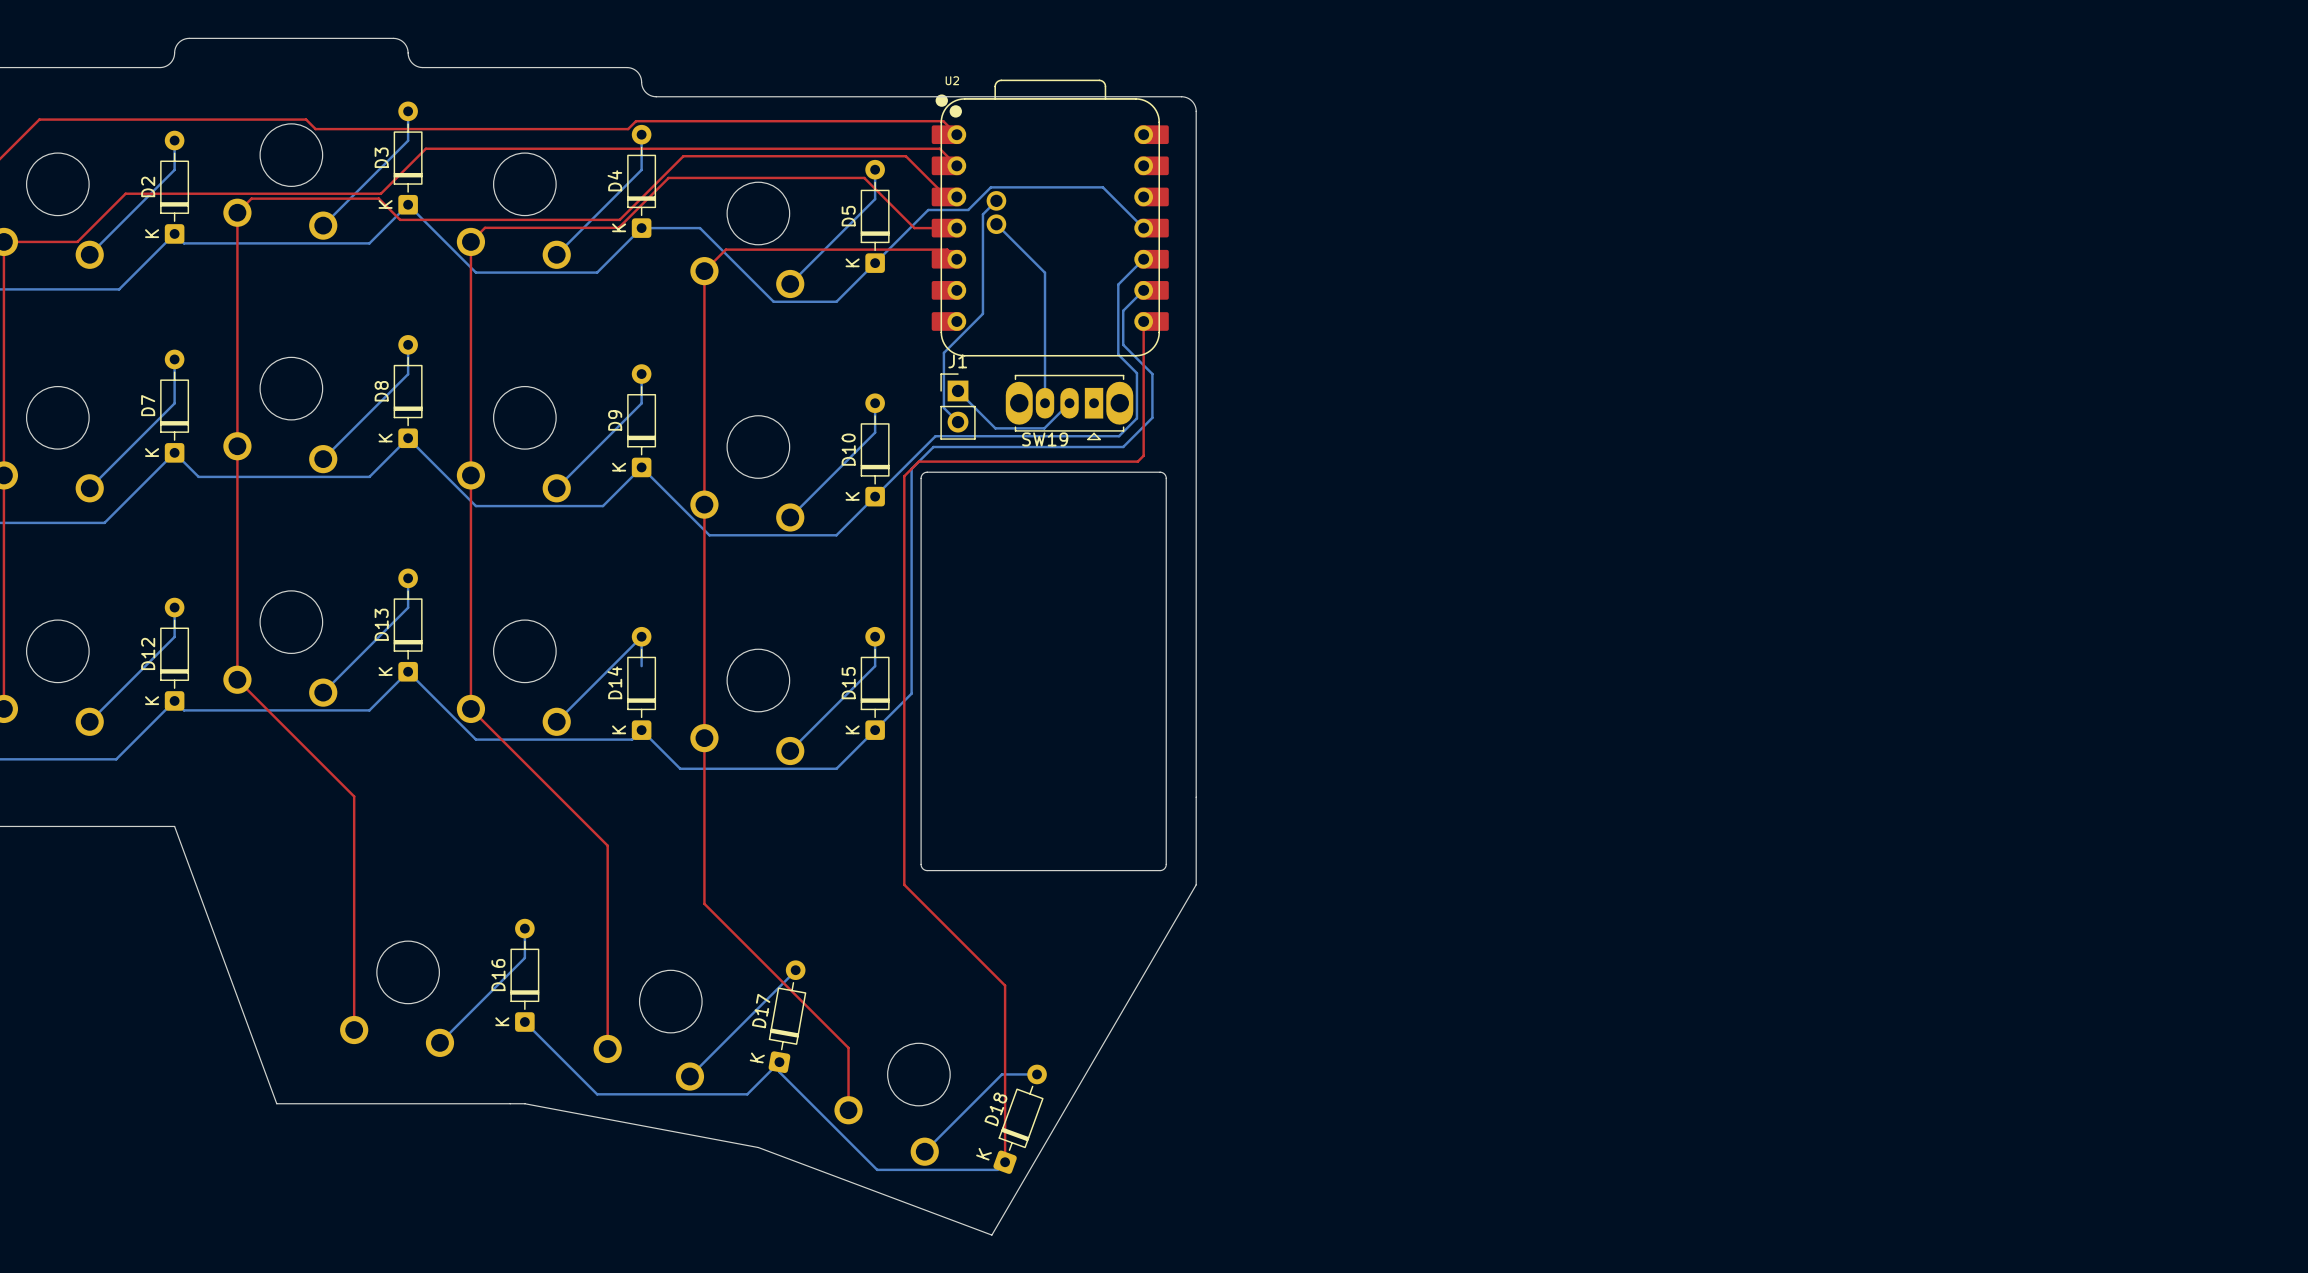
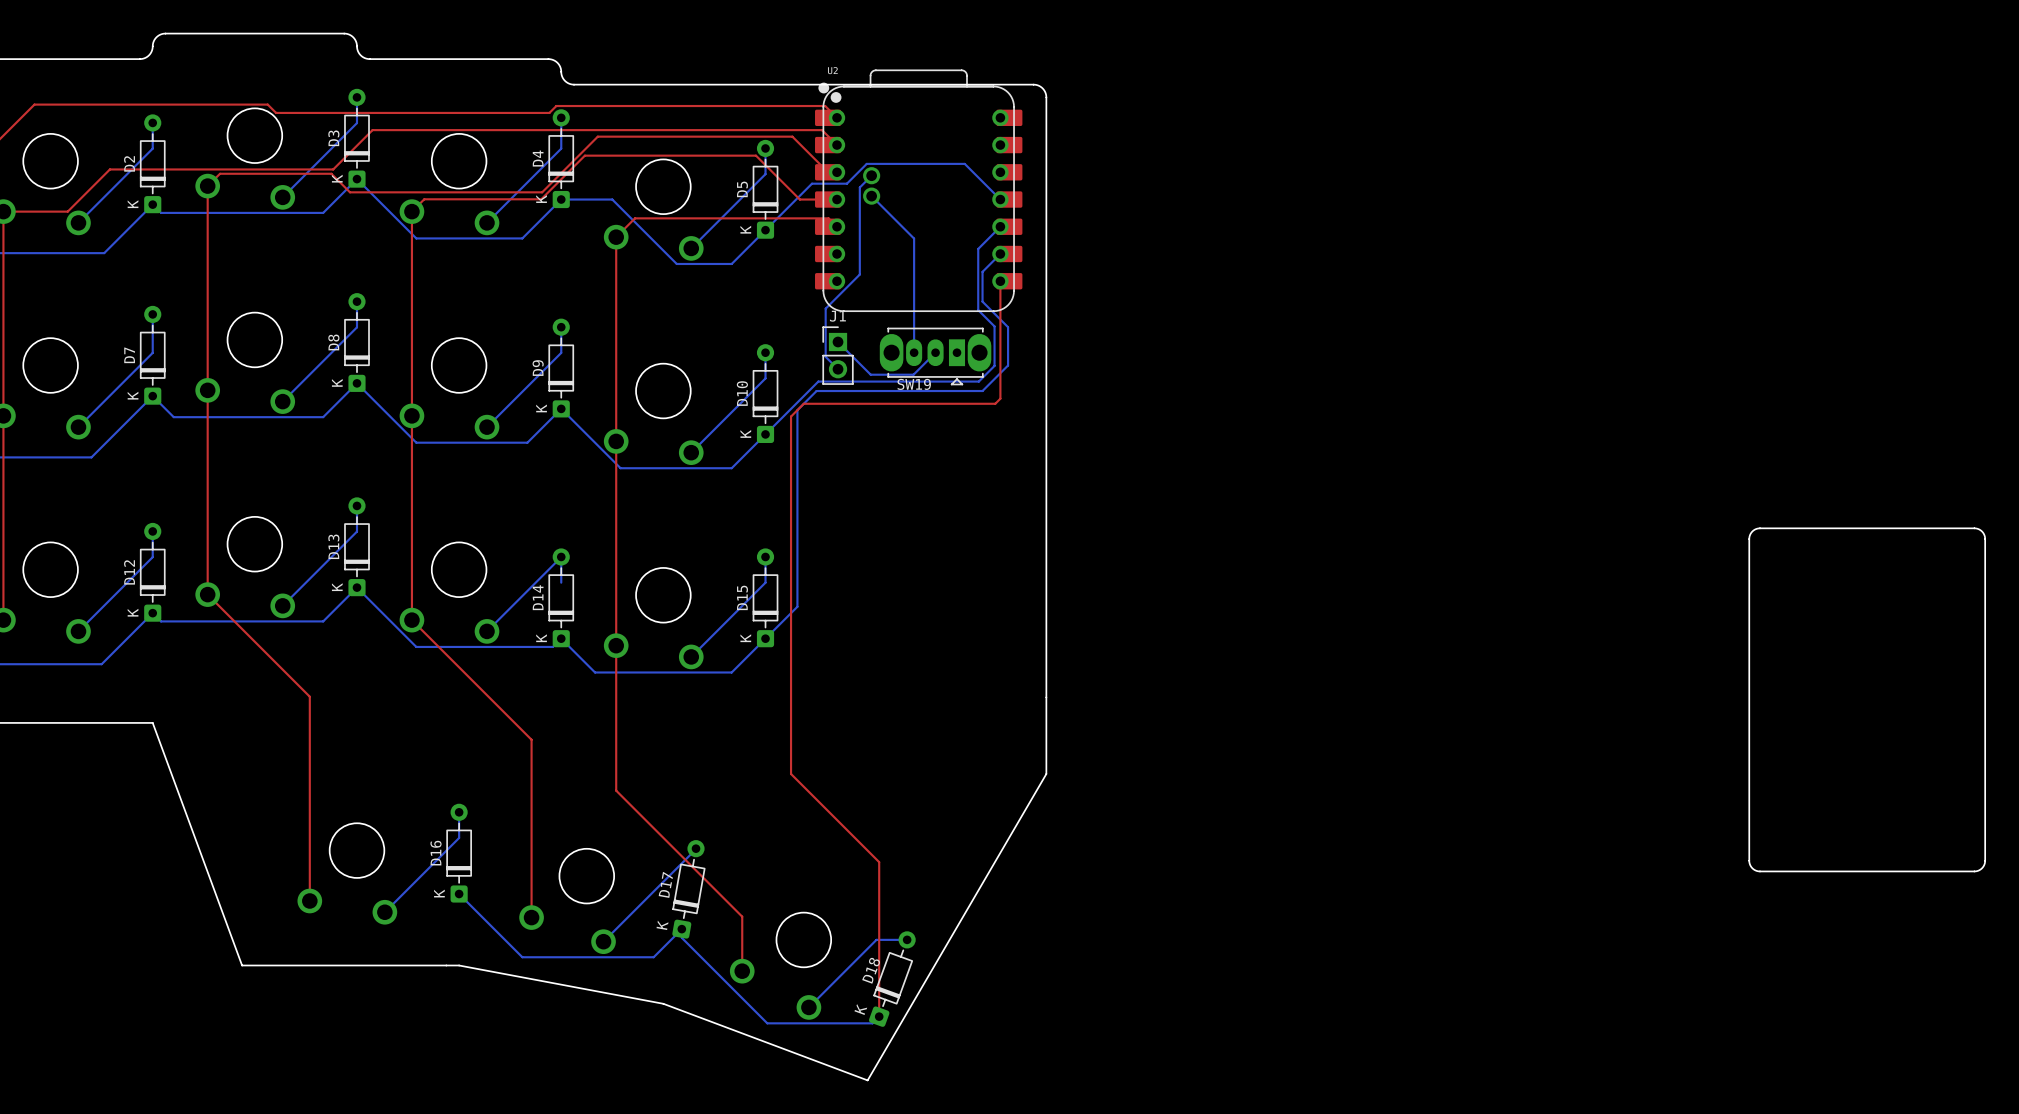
board edge: (927, 472) (1160, 472) (1165, 475) (1166, 864) (1163, 869) (927, 870) (922, 867) (921, 478) (922, 474) (927, 472) -> none
board edge: none -> (1759, 528) (1974, 528) (1983, 533) (1985, 539) (1985, 860) (1980, 869) (1974, 871) (1759, 871) (1750, 866) (1749, 860) (1749, 539) (1752, 531) (1759, 528)

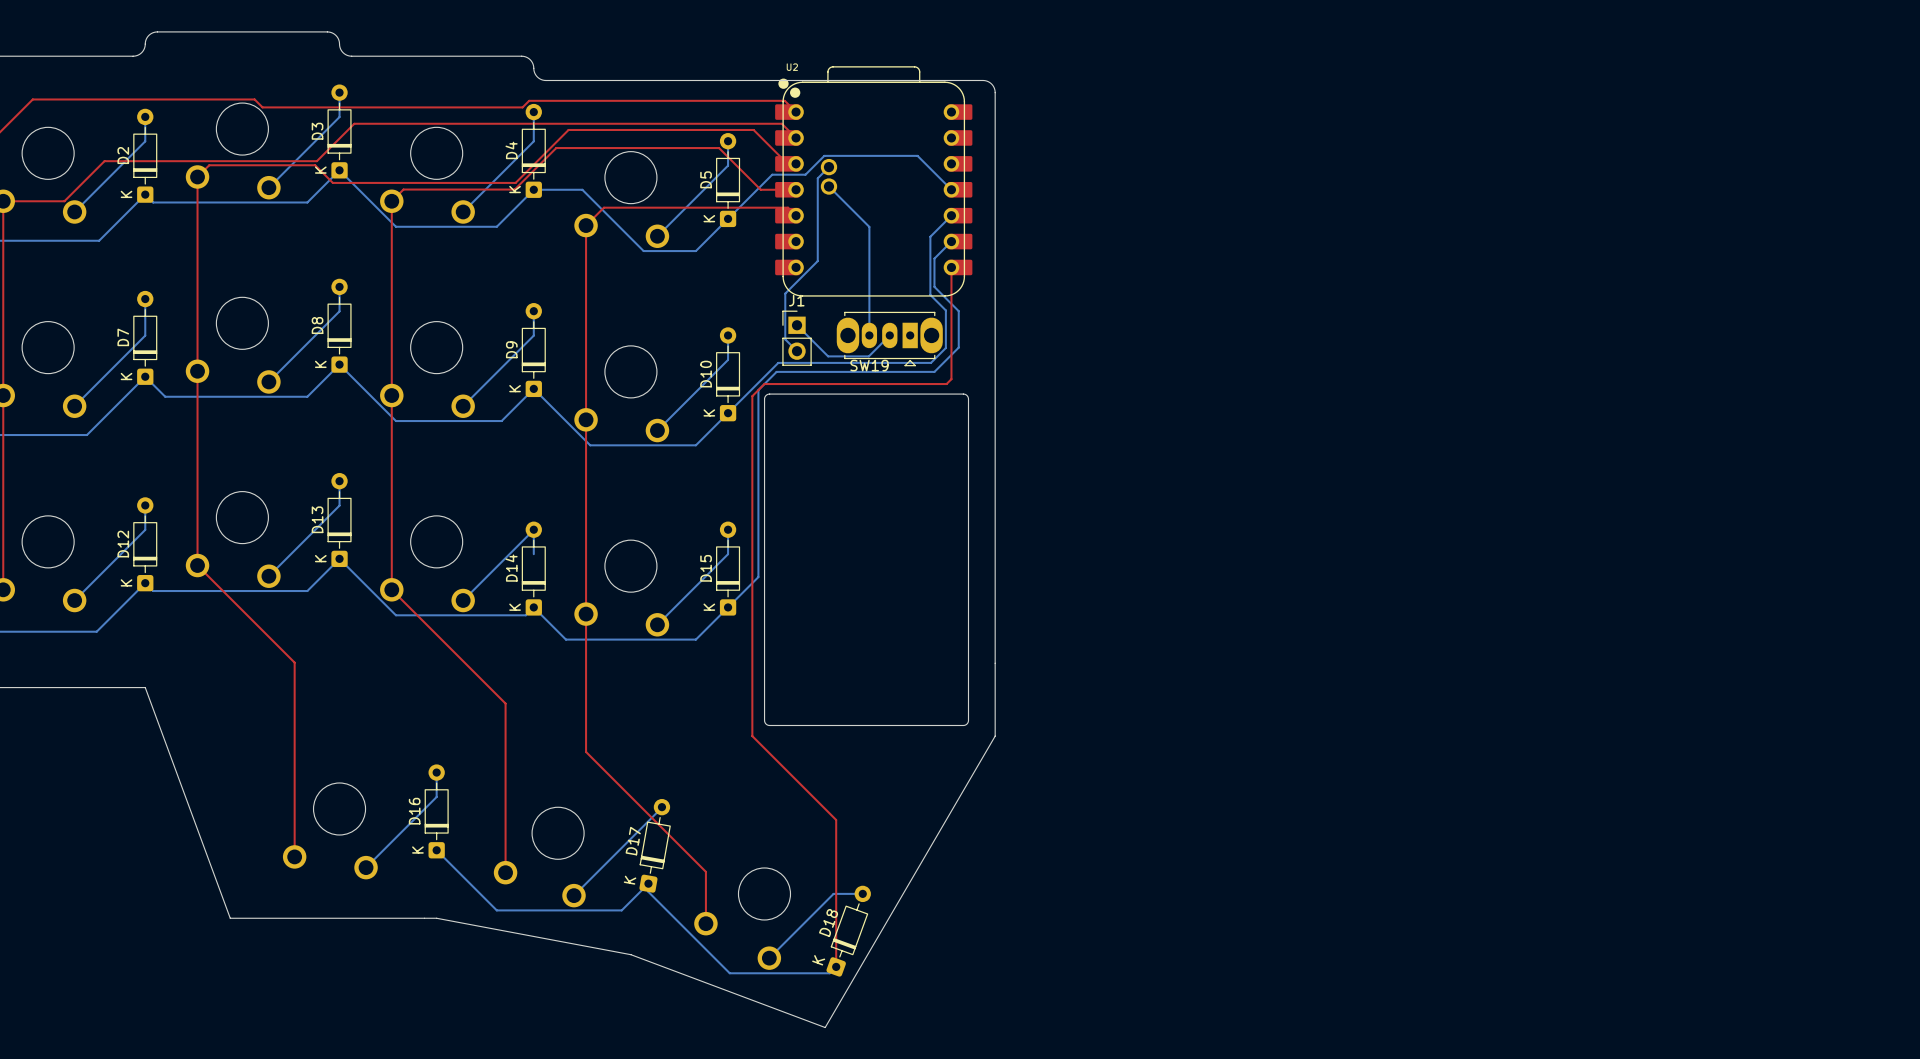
board edge: none -> (769, 394) (963, 394) (967, 396) (968, 720) (966, 724) (769, 725) (765, 722) (764, 399) (769, 394)
board edge: (1759, 528) (1974, 528) (1983, 533) (1985, 539) (1985, 860) (1980, 869) (1974, 871) (1759, 871) (1750, 866) (1749, 860) (1749, 539) (1752, 531) (1759, 528) -> none

